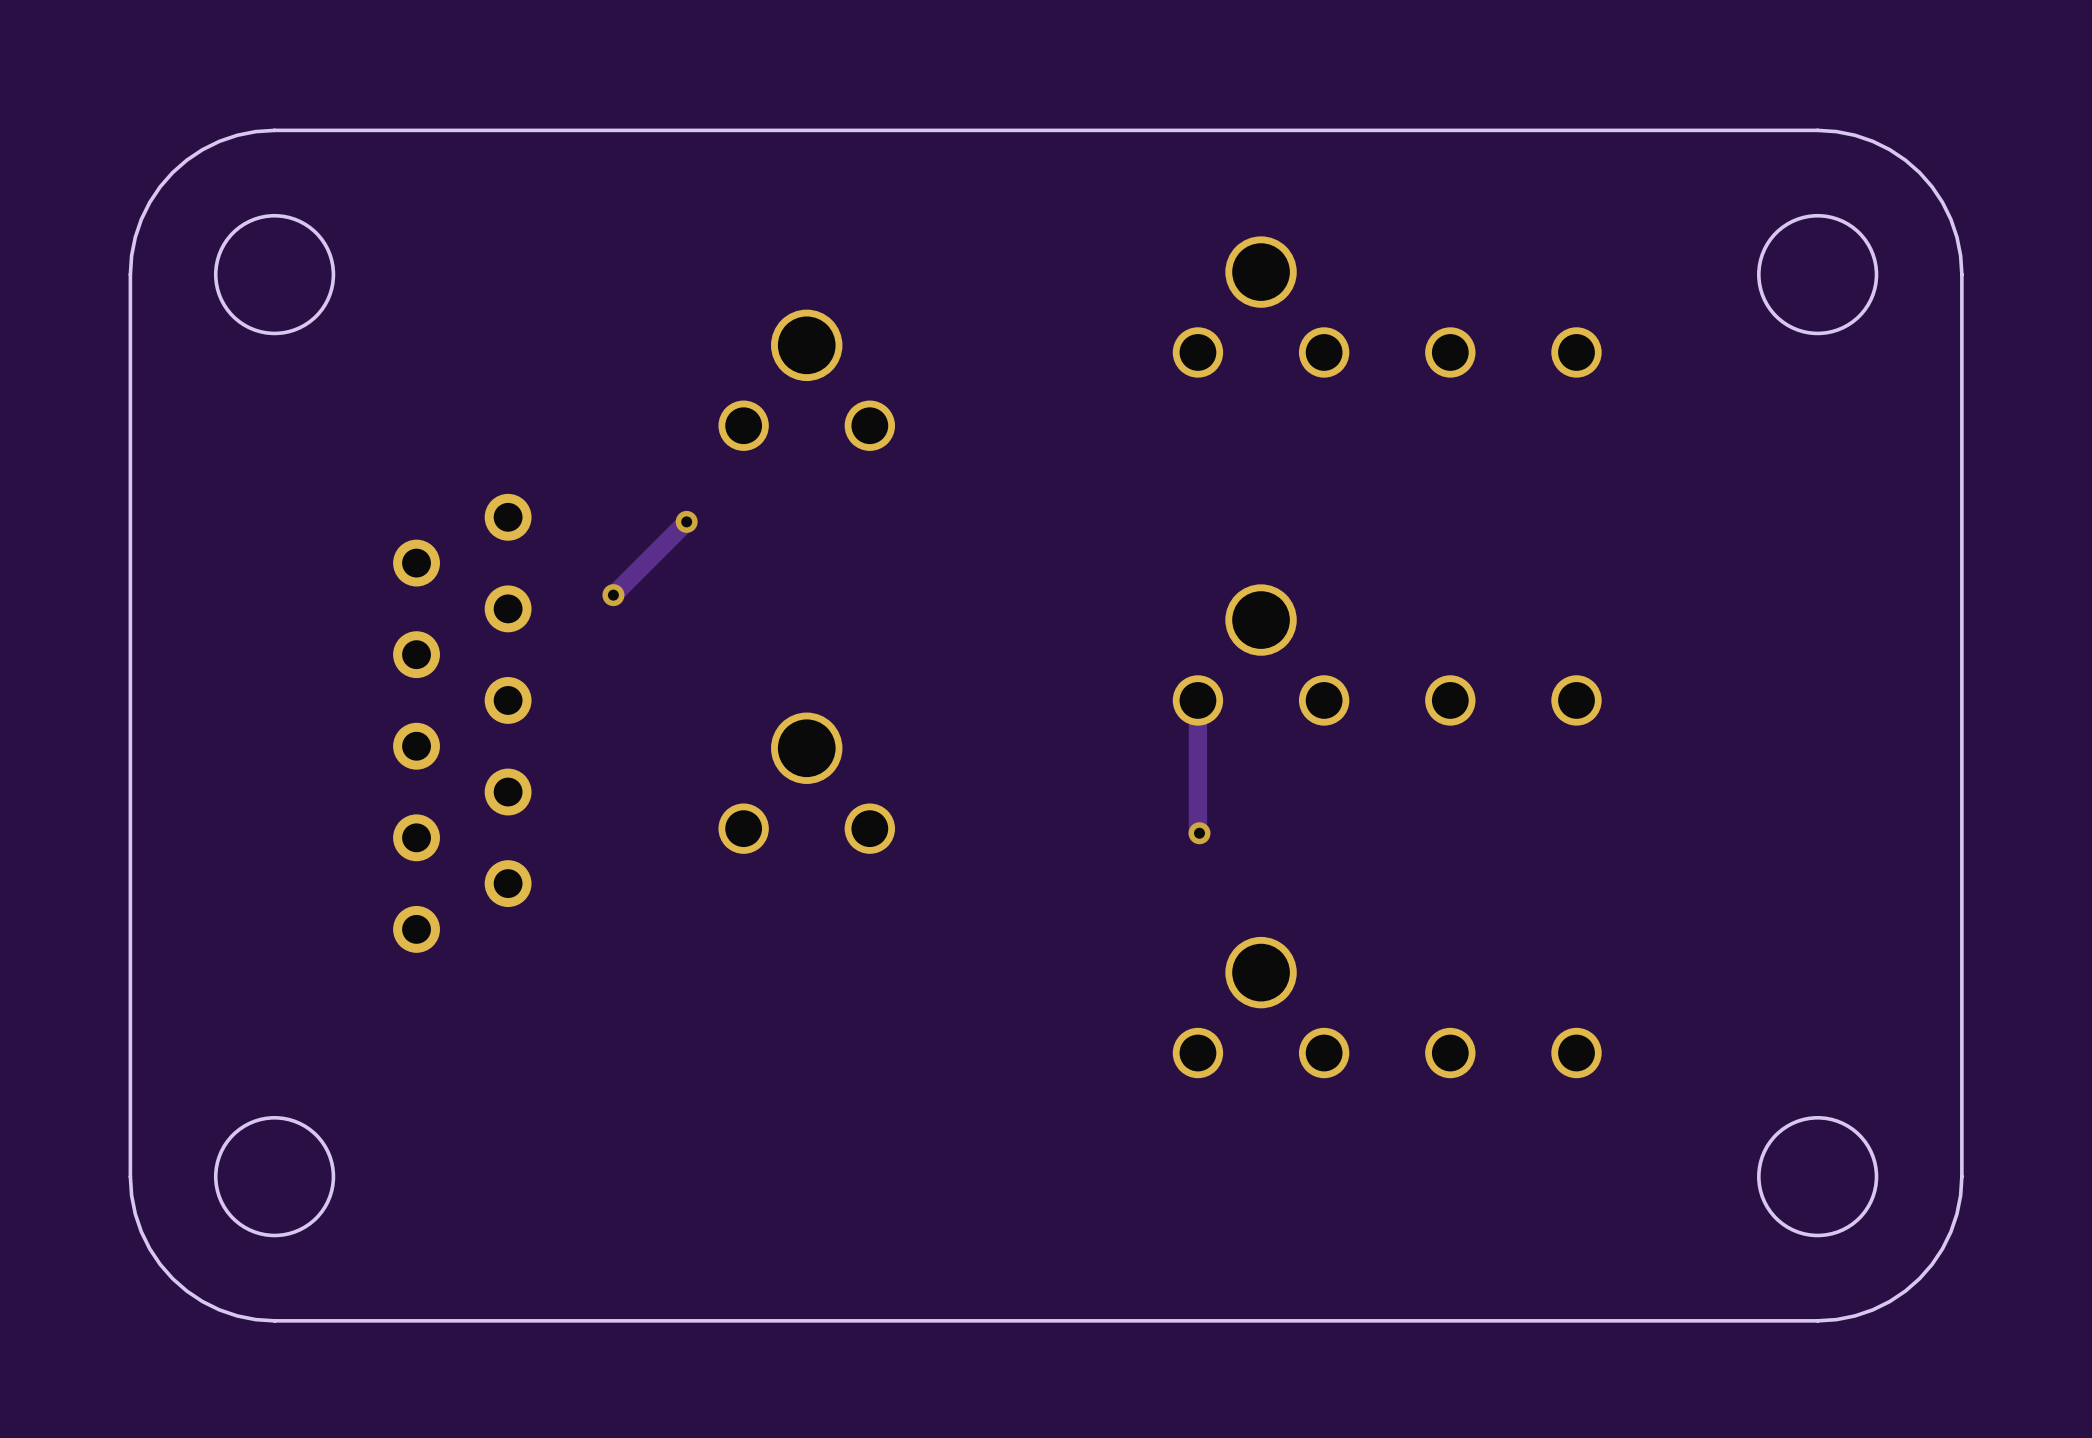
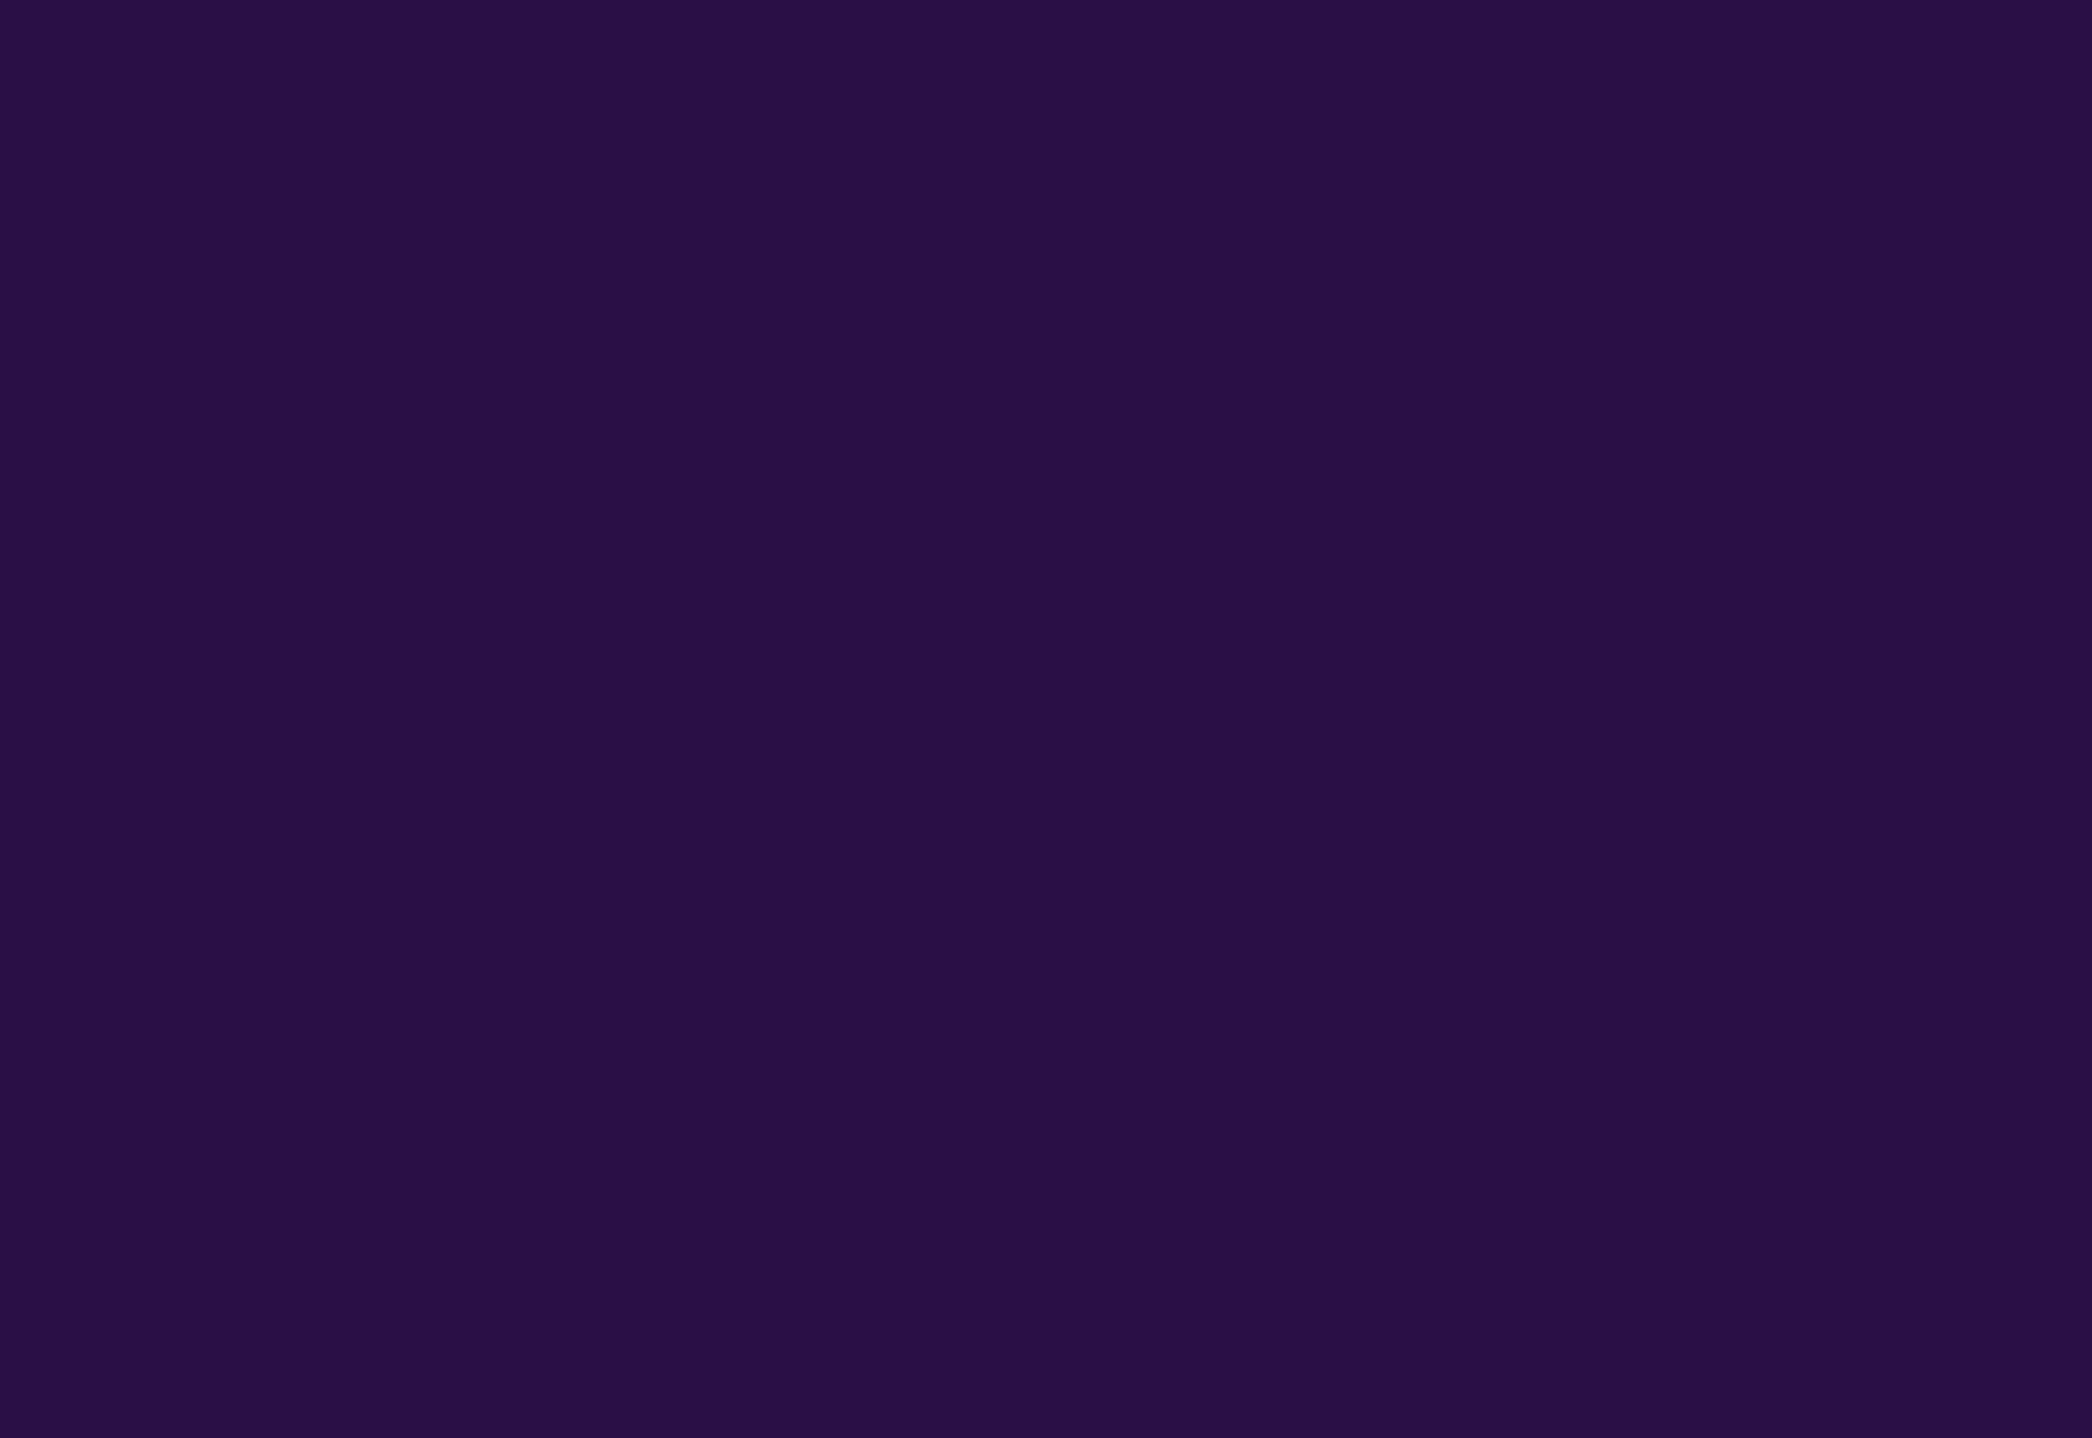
board edge: (1817, 130) (274, 130) (237, 135) (219, 141) (186, 160) (160, 186) (149, 202) (135, 237) (130, 274) (130, 1176) (135, 1213) (141, 1231) (160, 1264) (186, 1291) (202, 1301) (237, 1315) (274, 1320) (1817, 1320) (1854, 1315) (1872, 1309) (1905, 1291) (1932, 1264) (1950, 1231) (1956, 1213) (1961, 1176) (1960, 255) (1956, 237) (1942, 202) (1932, 186) (1905, 160) (1872, 141) (1854, 135) (1817, 130) -> none
round board edge: [213, 213, 336, 336] -> none
round board edge: [1757, 213, 1879, 336] -> none
part: (1387, 307) -> none
part: (806, 380) -> none
track: (686, 521) (613, 595) -> none
via: (686, 521) -> none
via: (613, 595) -> none
part: (1387, 654) -> none
track: (1197, 700) (1197, 831) (1199, 833) -> none
part: (462, 723) -> none
part: (806, 783) -> none
via: (1199, 833) -> none
part: (1387, 1007) -> none
round board edge: [213, 1116, 336, 1238] -> none
round board edge: [1757, 1116, 1879, 1238] -> none

